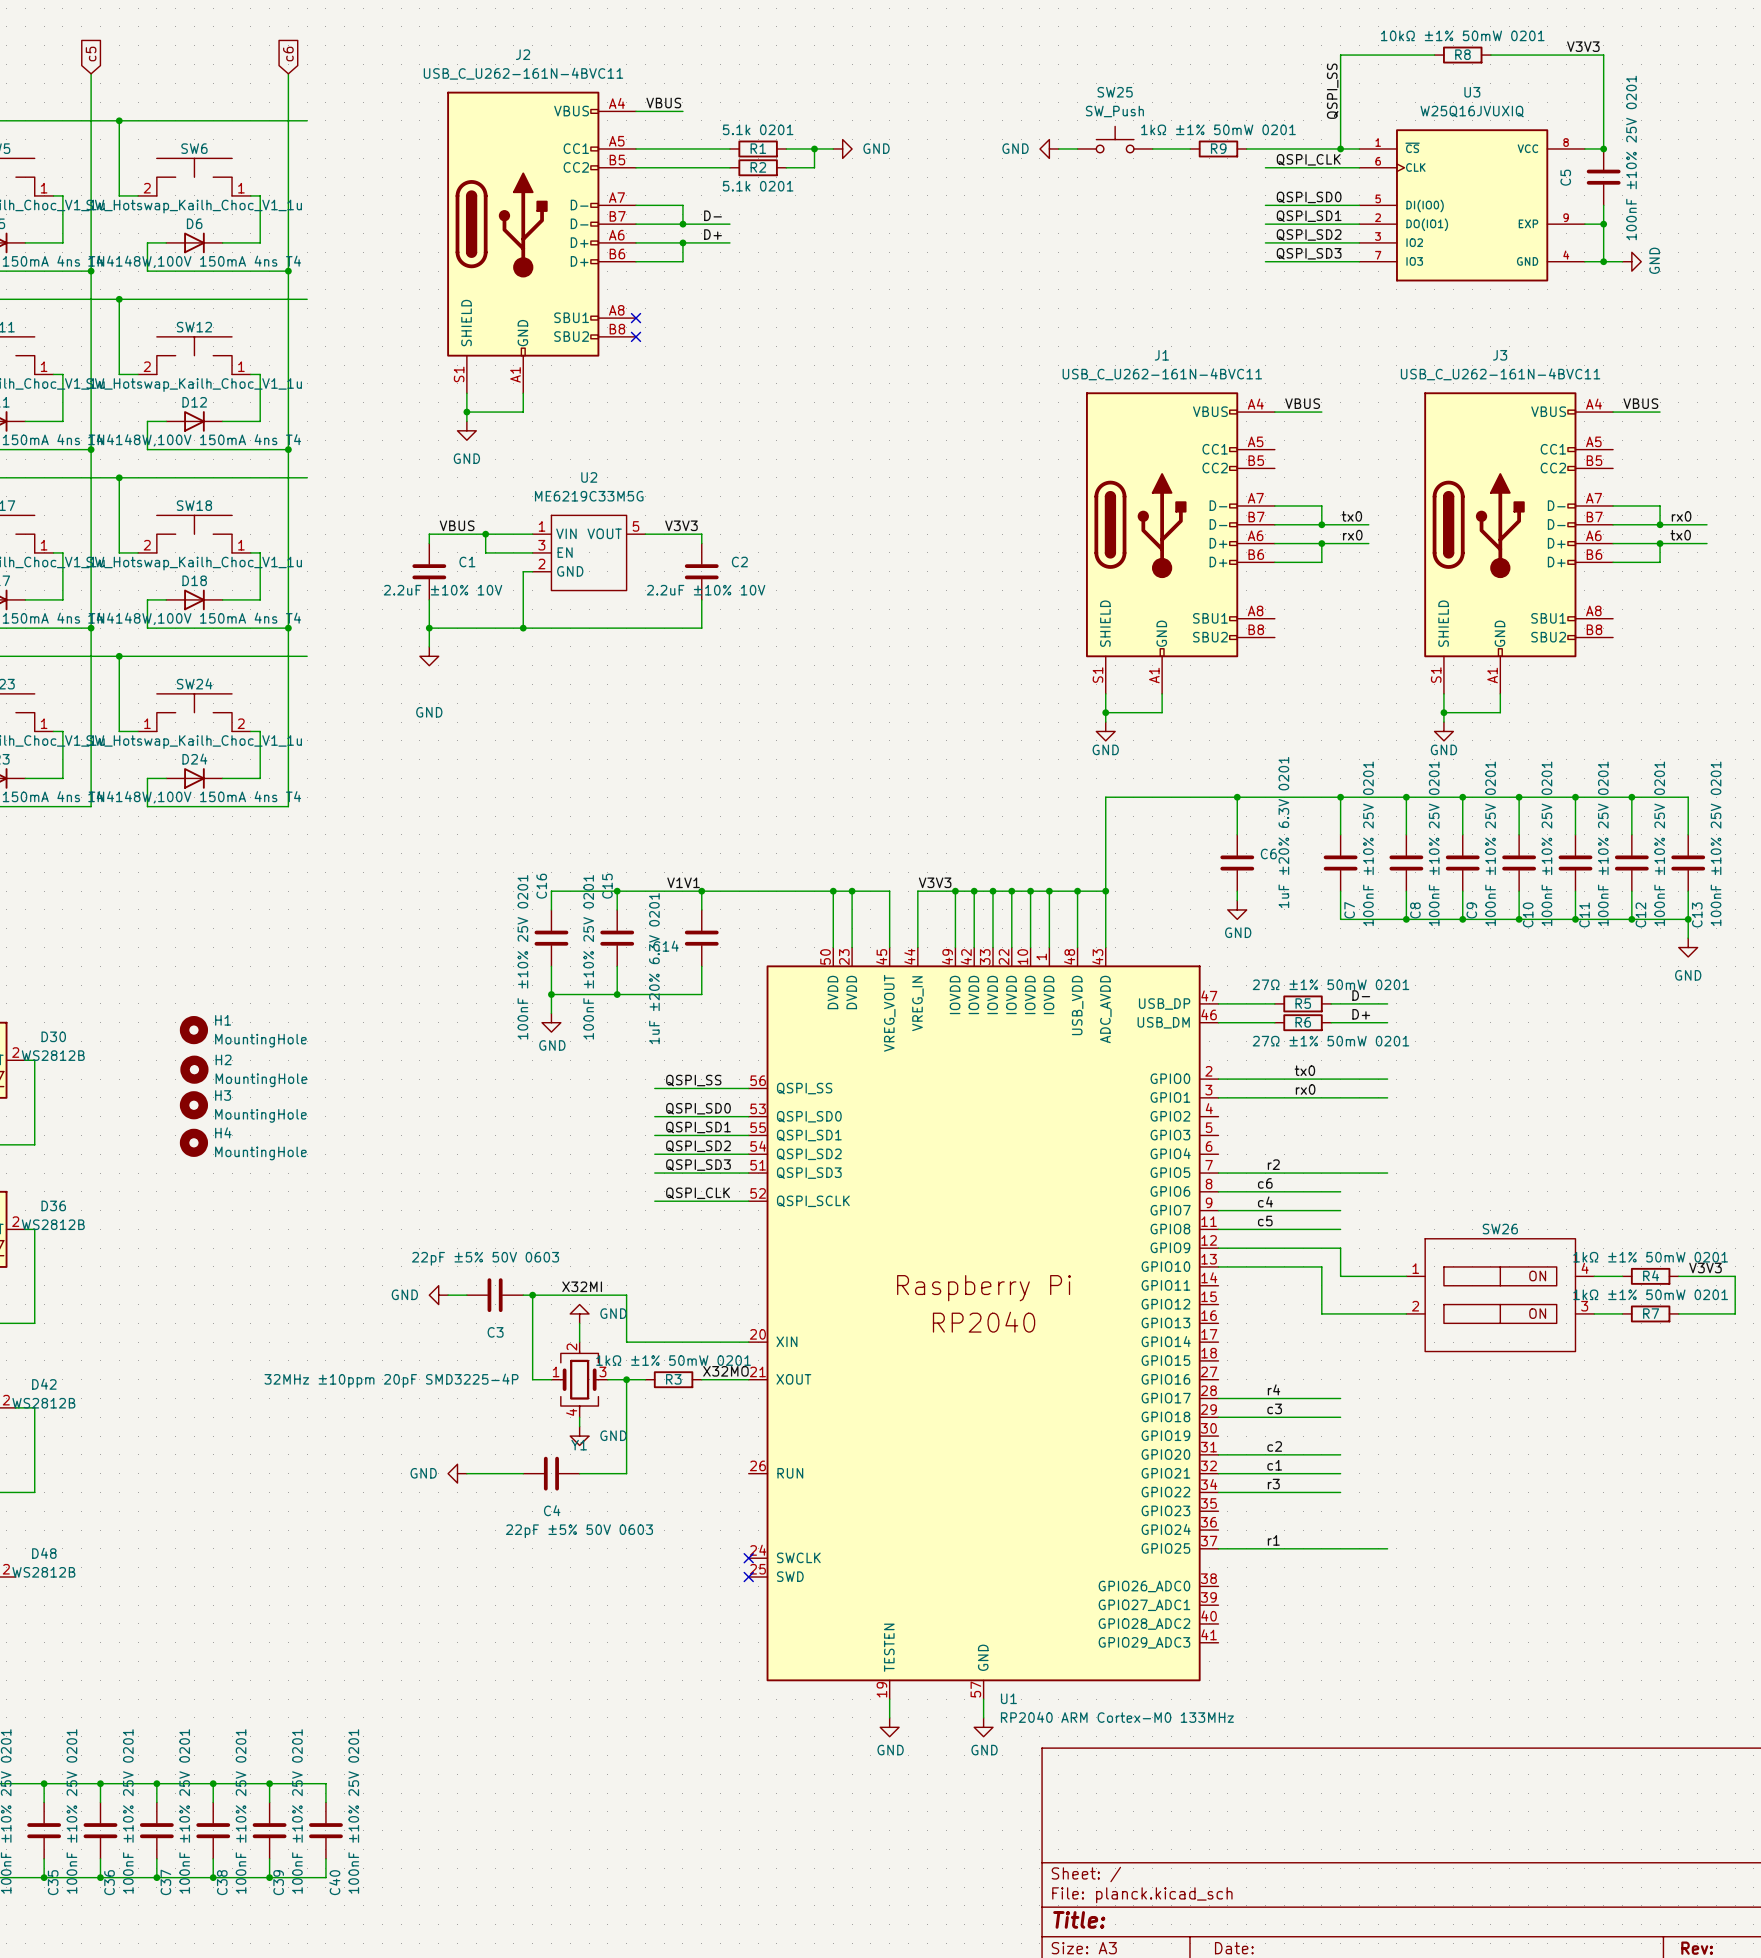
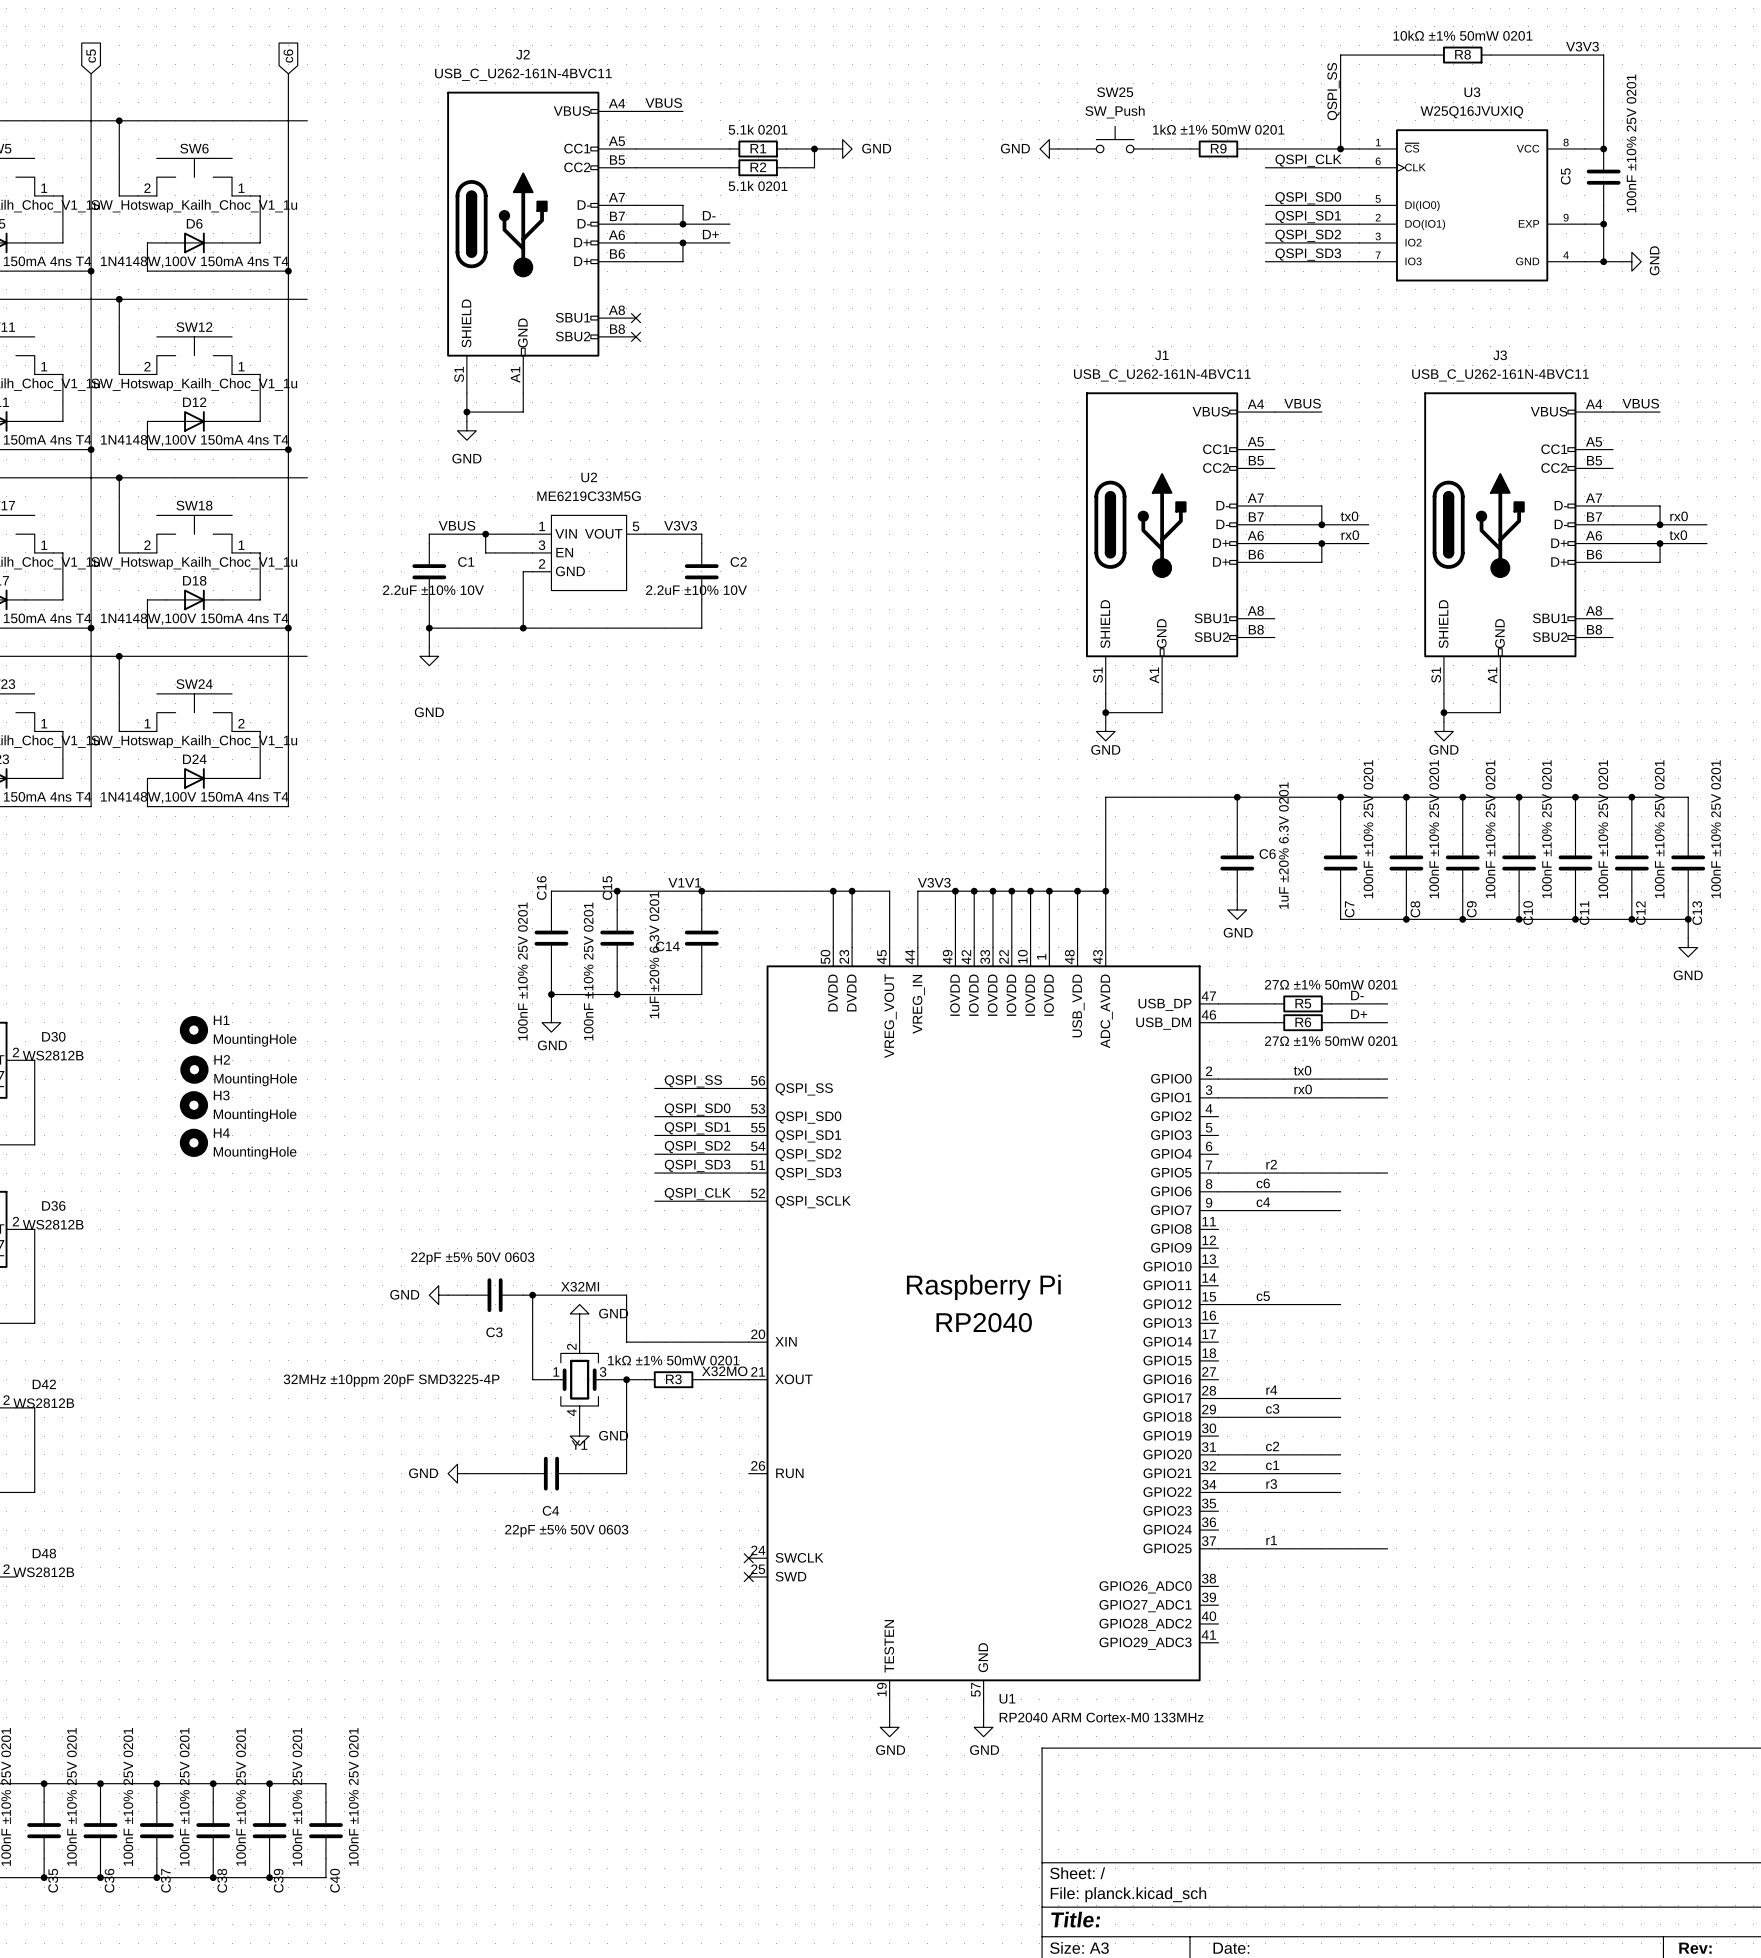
label position: c5 (1265, 1221) -> c5 (1263, 1296)
wire: (1218, 1229) (1340, 1229) -> (1218, 1304) (1340, 1304)
wire: (1218, 1248) (1340, 1248) (1340, 1276) (1406, 1276) -> none
wire: (1218, 1266) (1321, 1266) (1321, 1313) (1406, 1313) -> none
label: V3V3 (1705, 1267) -> none
wire: (1594, 1276) (1622, 1276) -> none
R4: 1kΩ ±1% 50mW 0201 (1650, 1276) -> none
wire: (1678, 1276) (1735, 1276) (1735, 1313) (1678, 1313) -> none
SW26: (1500, 1295) -> none
wire: (1594, 1313) (1622, 1313) -> none
R7: 1kΩ ±1% 50mW 0201 (1650, 1313) -> none

